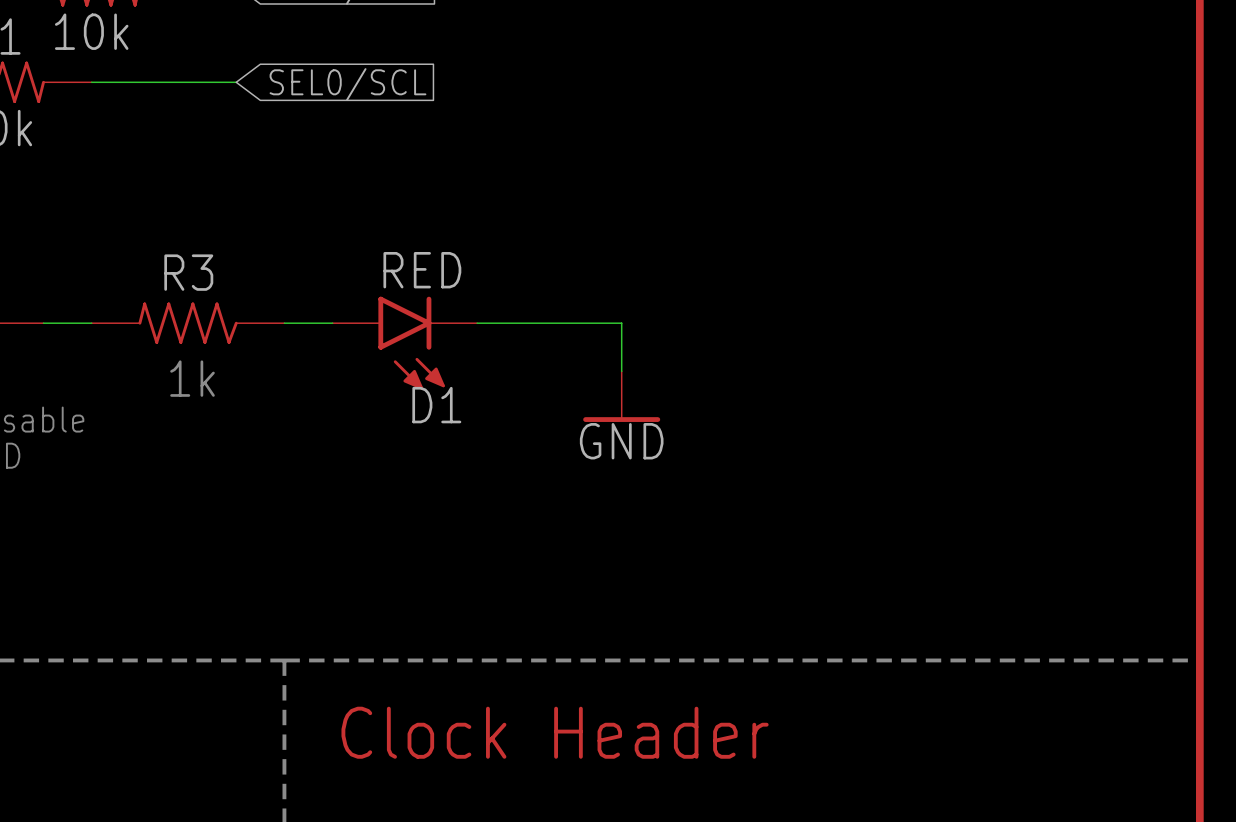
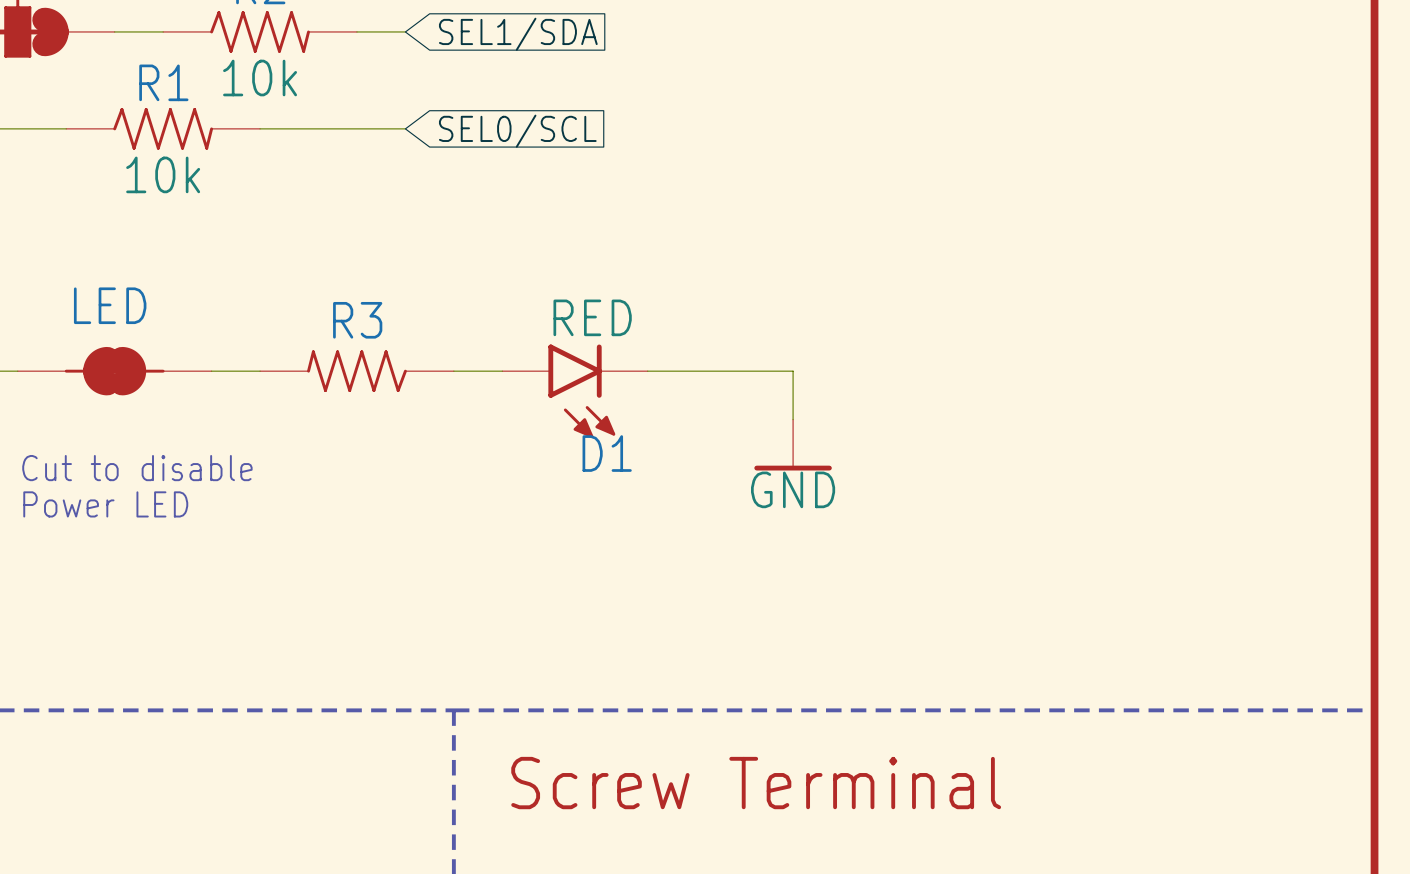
text: 1k (192, 378) -> none
text: Clock Header (555, 732) -> Screw Terminal (756, 783)

